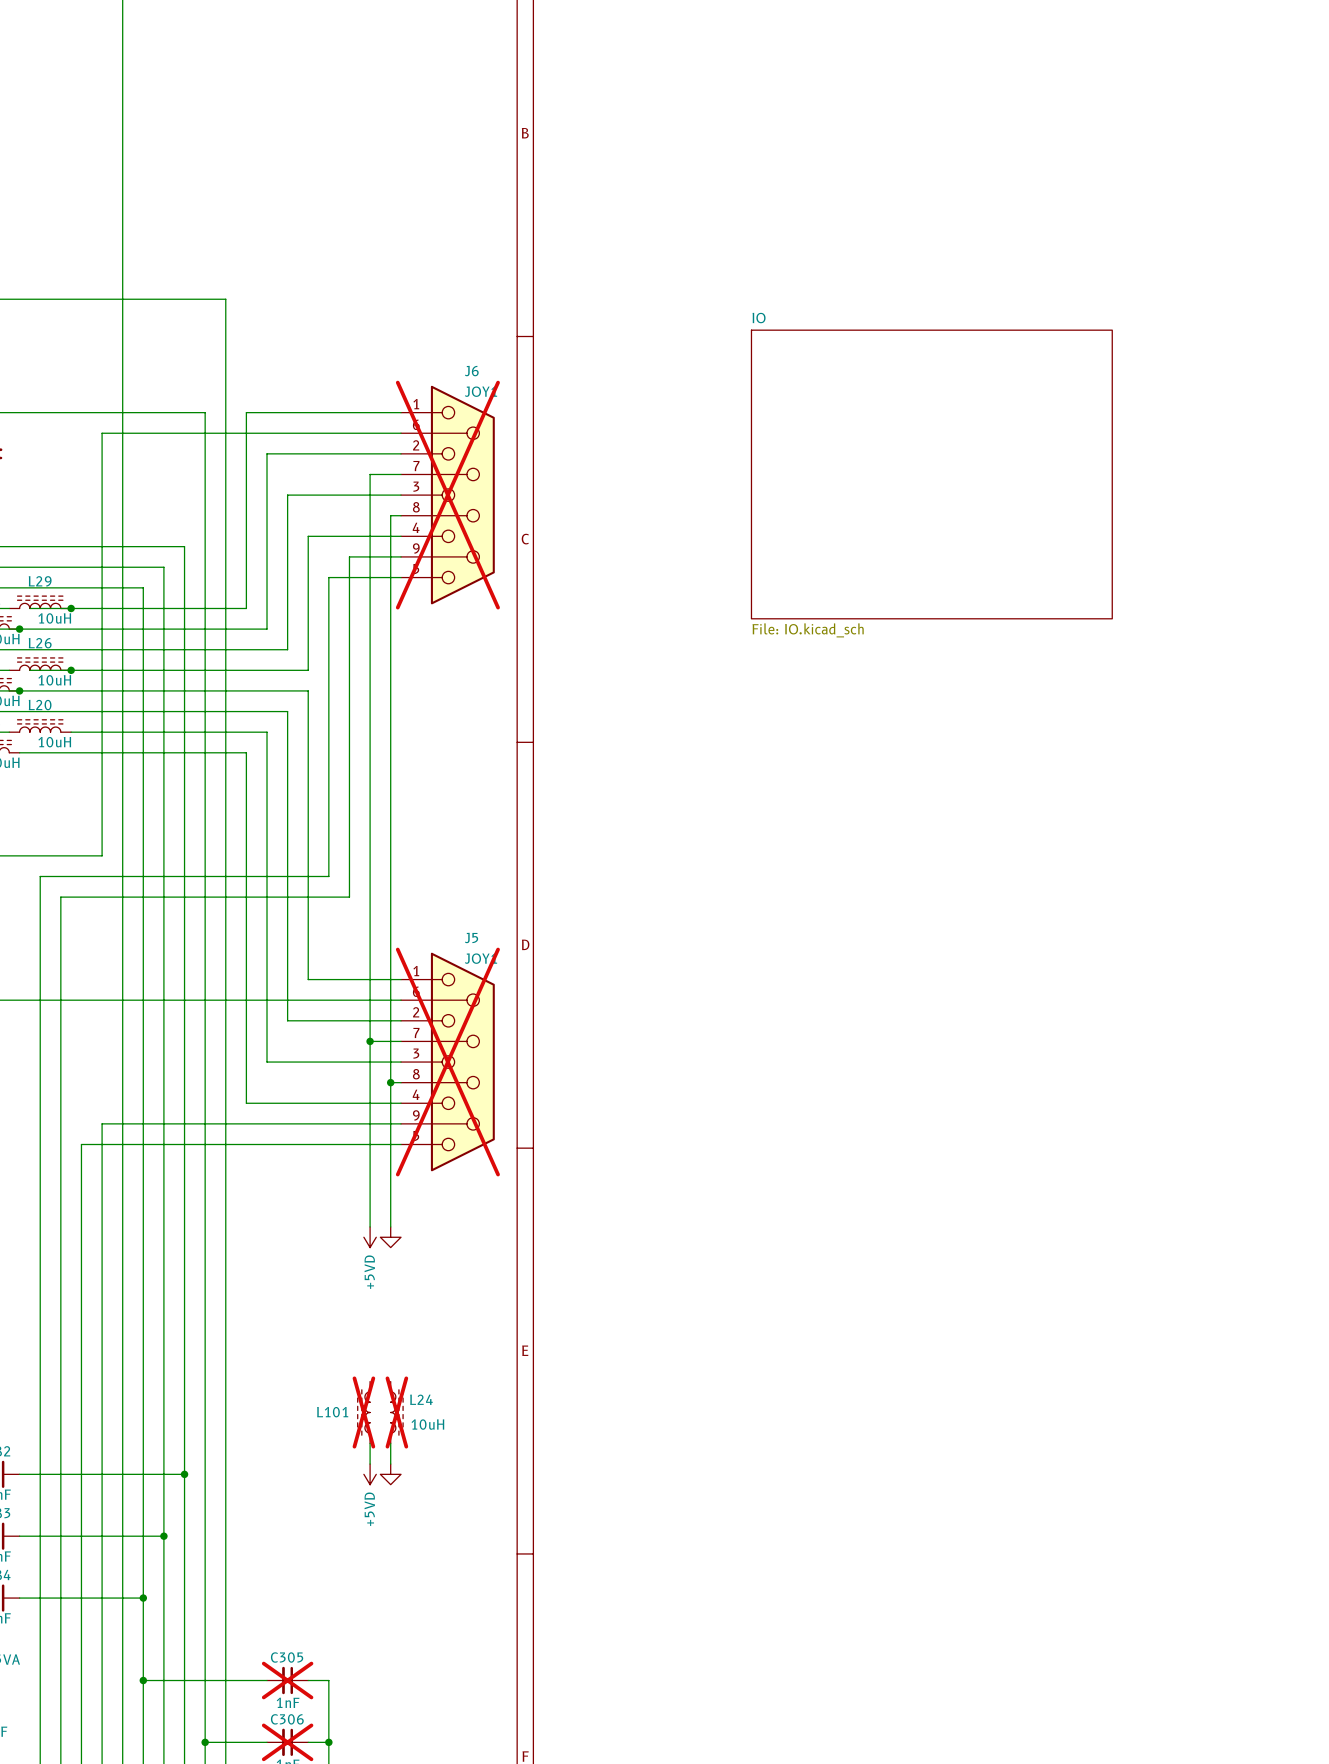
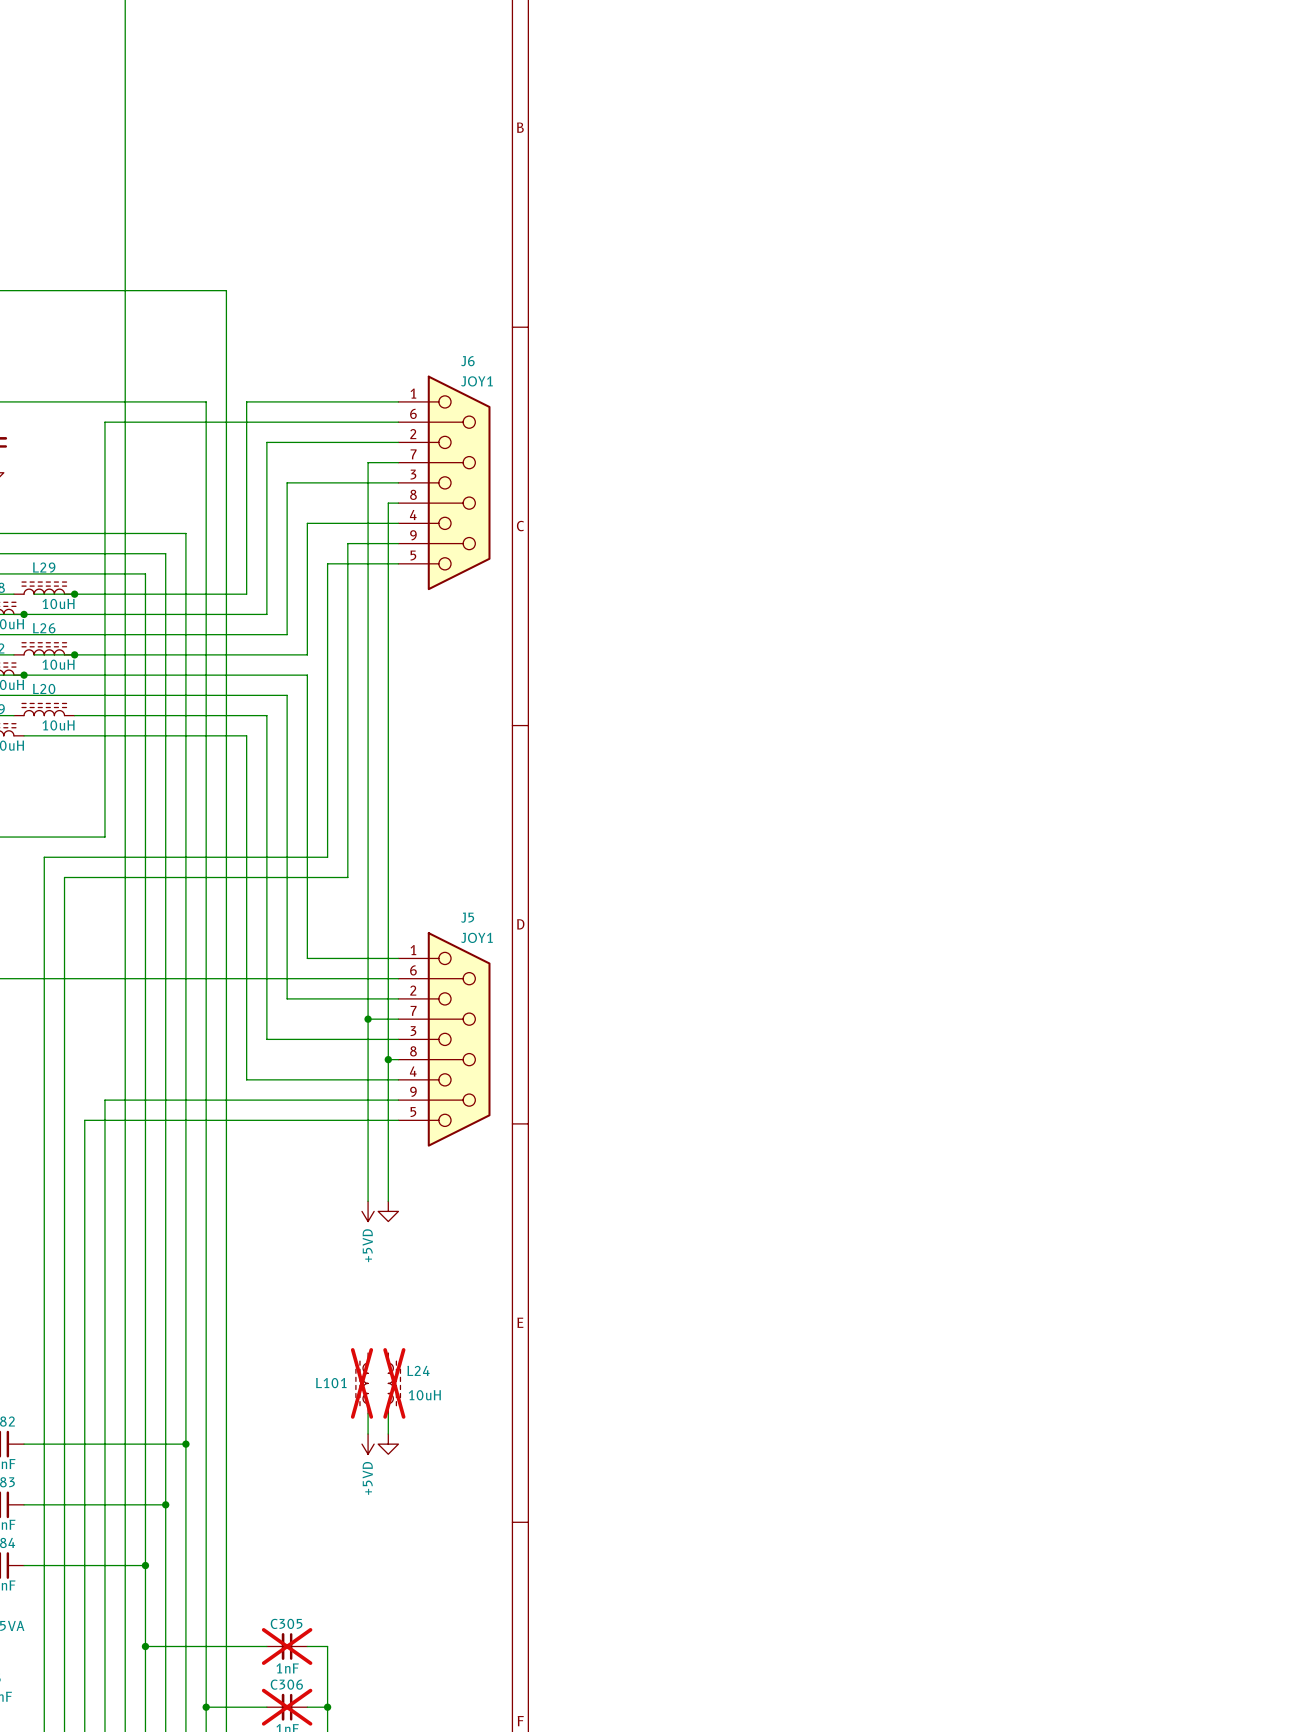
sheet IO: File: IO.kicad_sch (931, 474) -> none
J6 do-not-place cross: (447, 495) -> none
J5 do-not-place cross: (447, 1062) -> none

